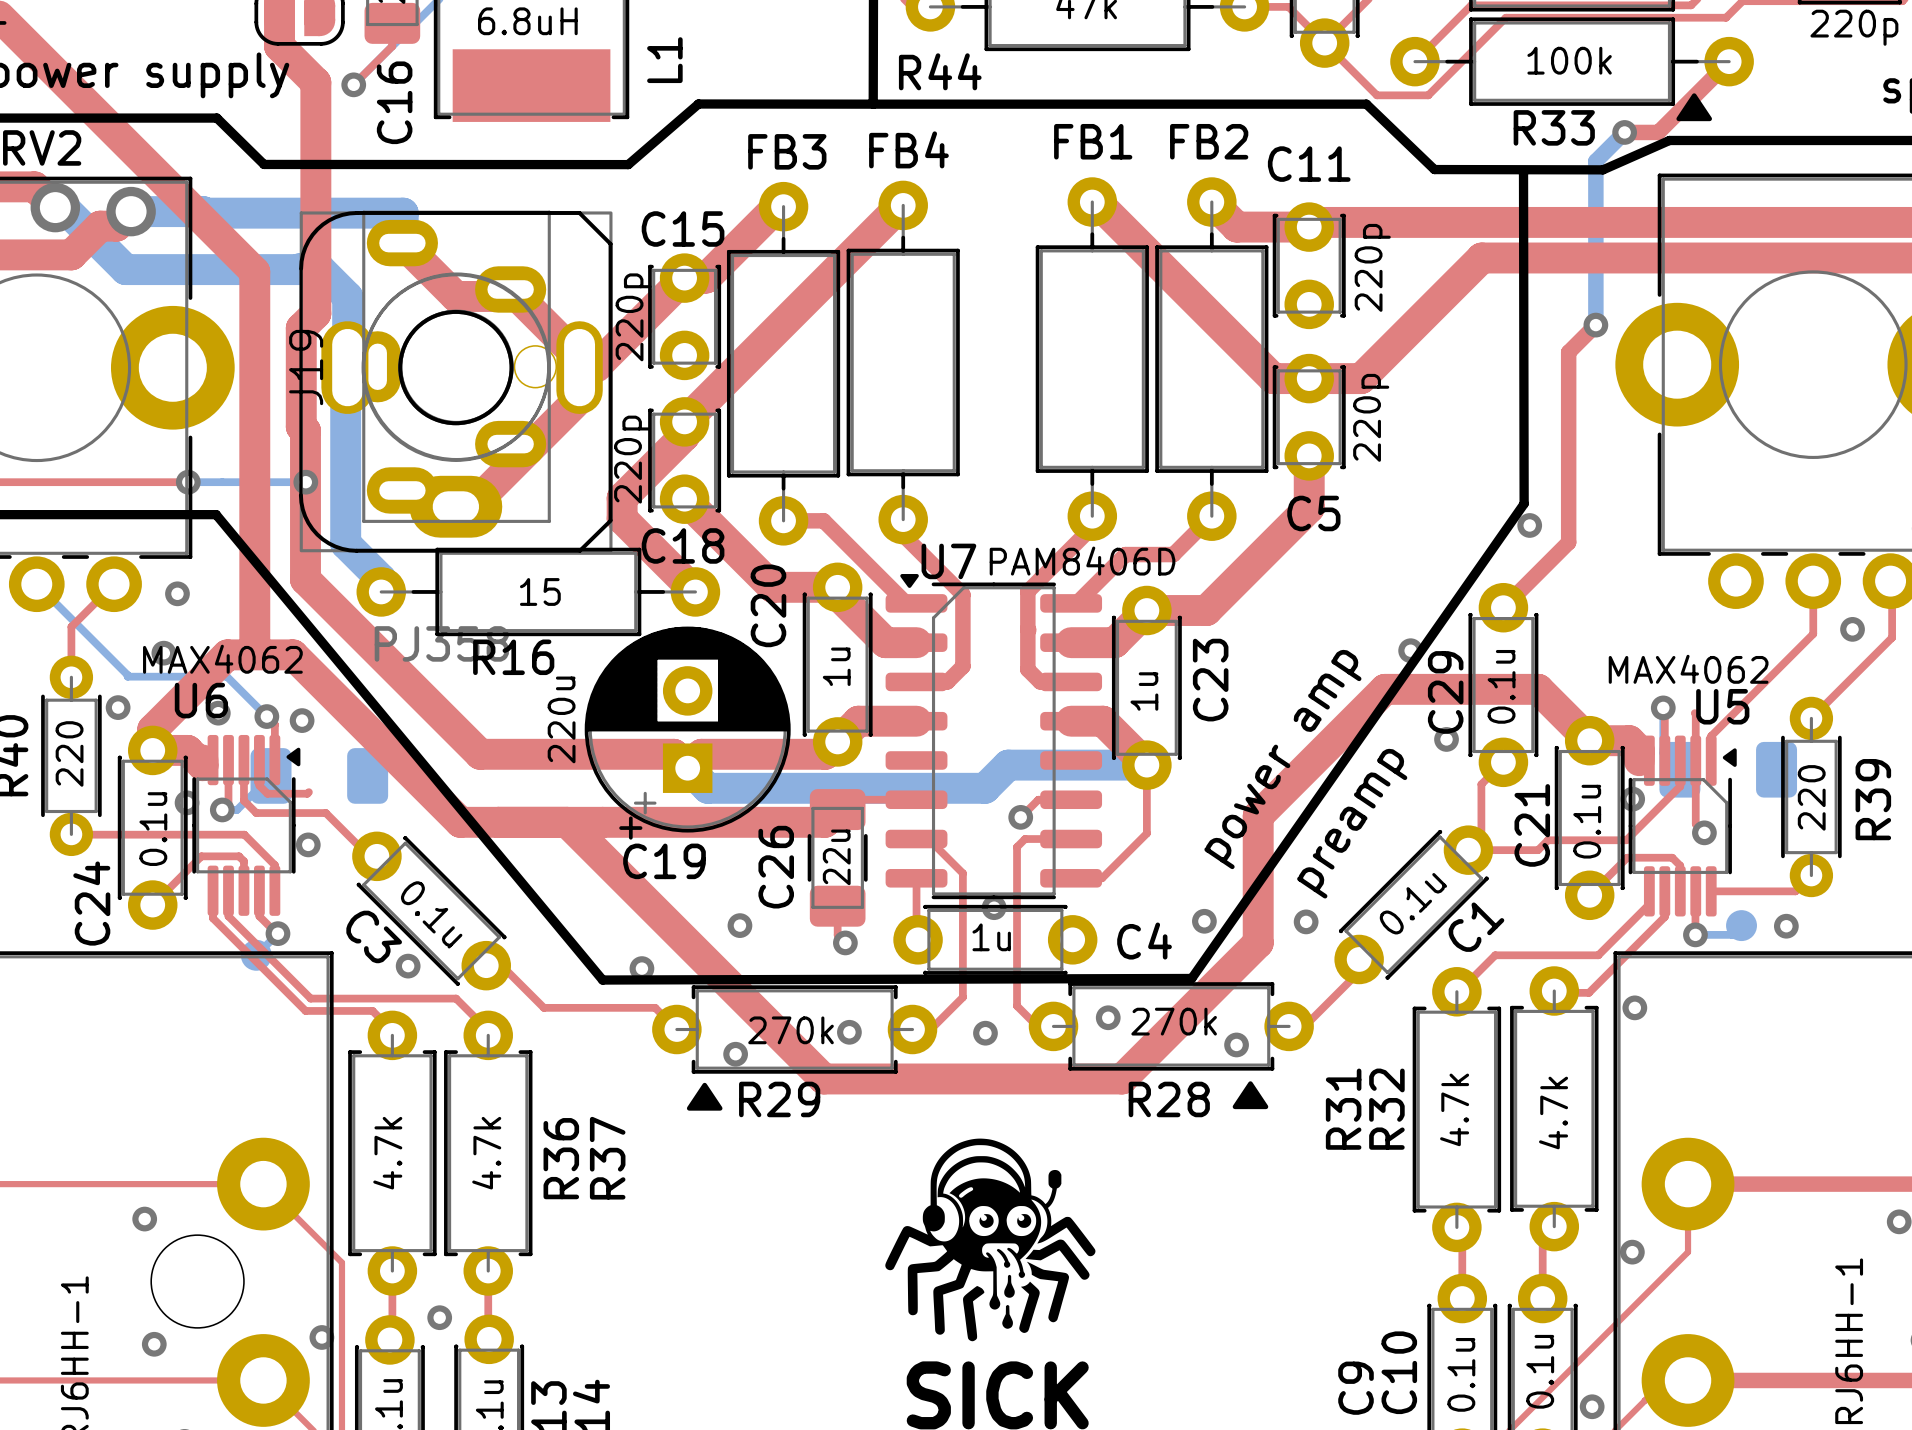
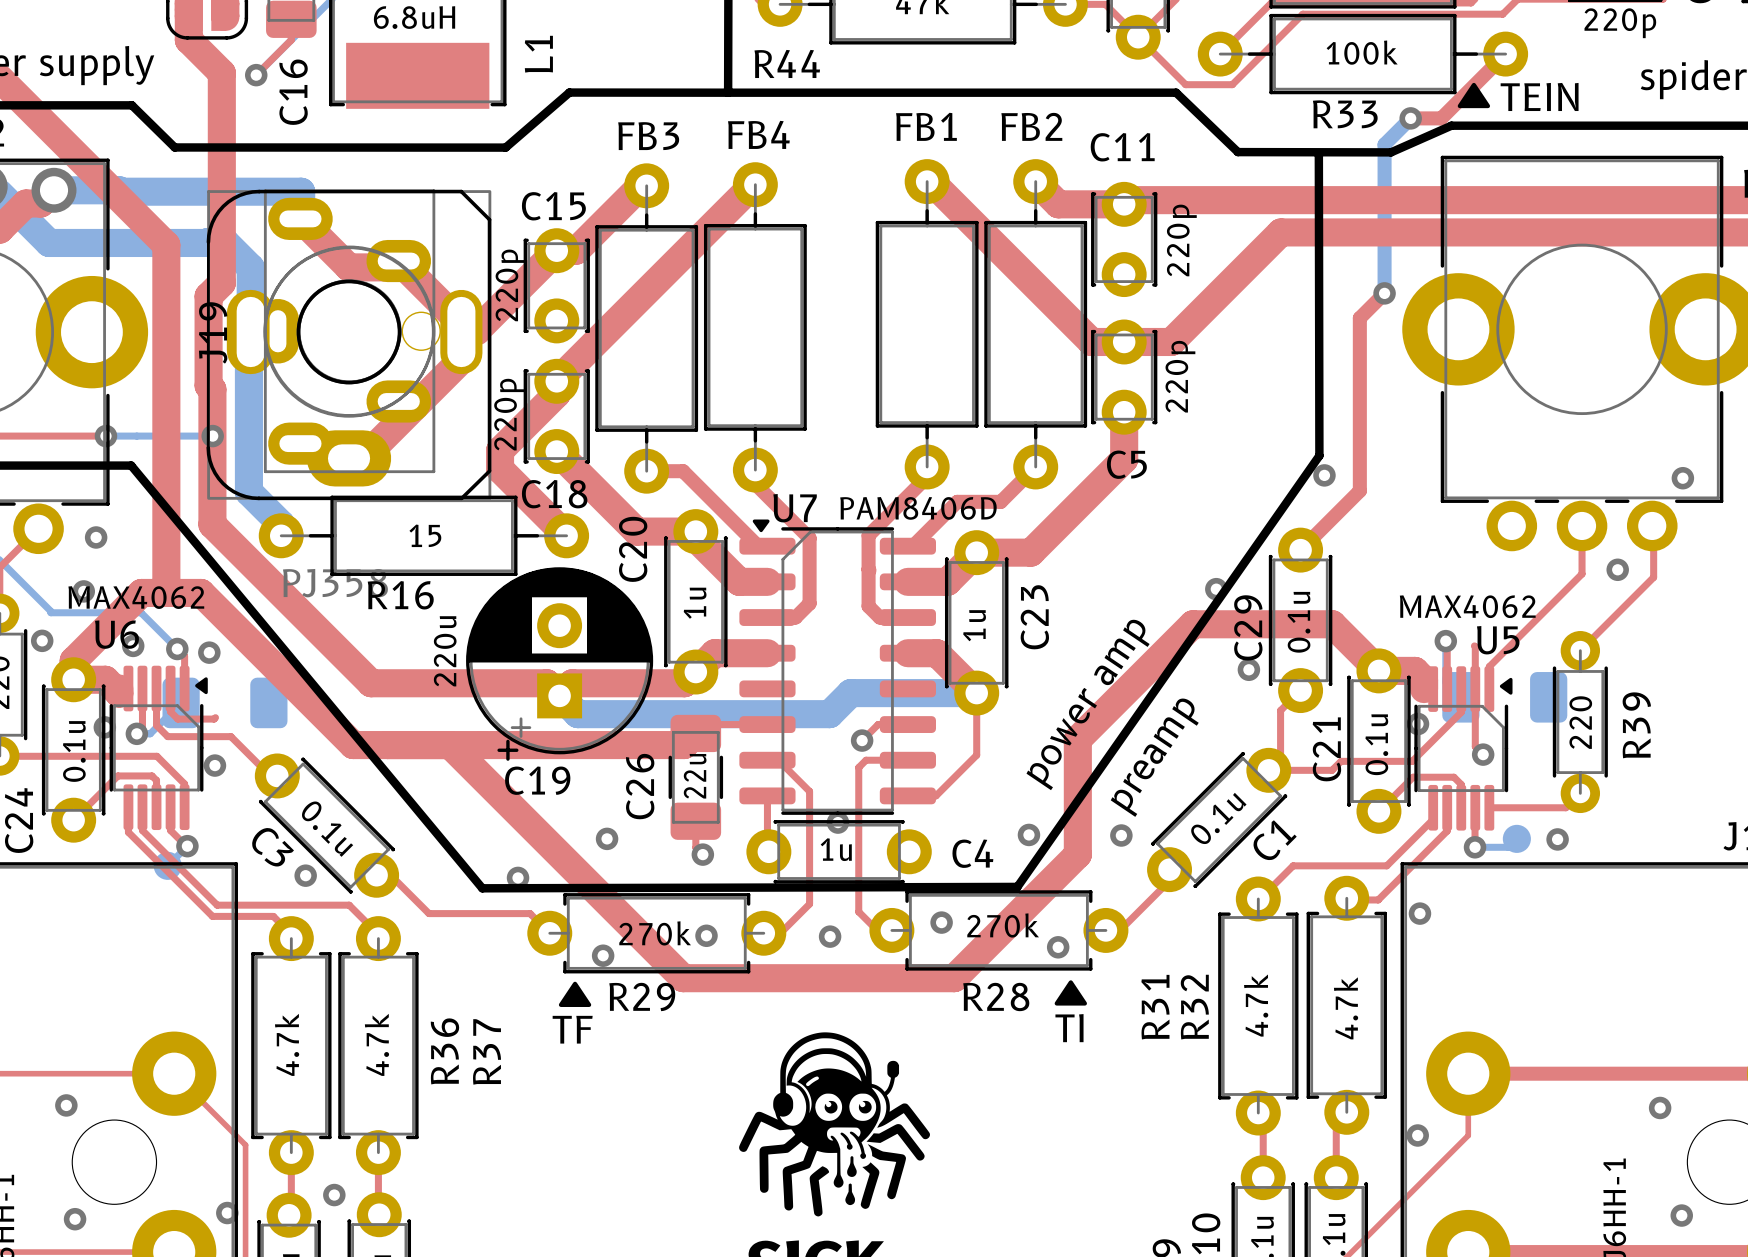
text: none -> TEIN (1539, 96)
text: none -> TI (1069, 1028)
text: none -> TF (572, 1029)

